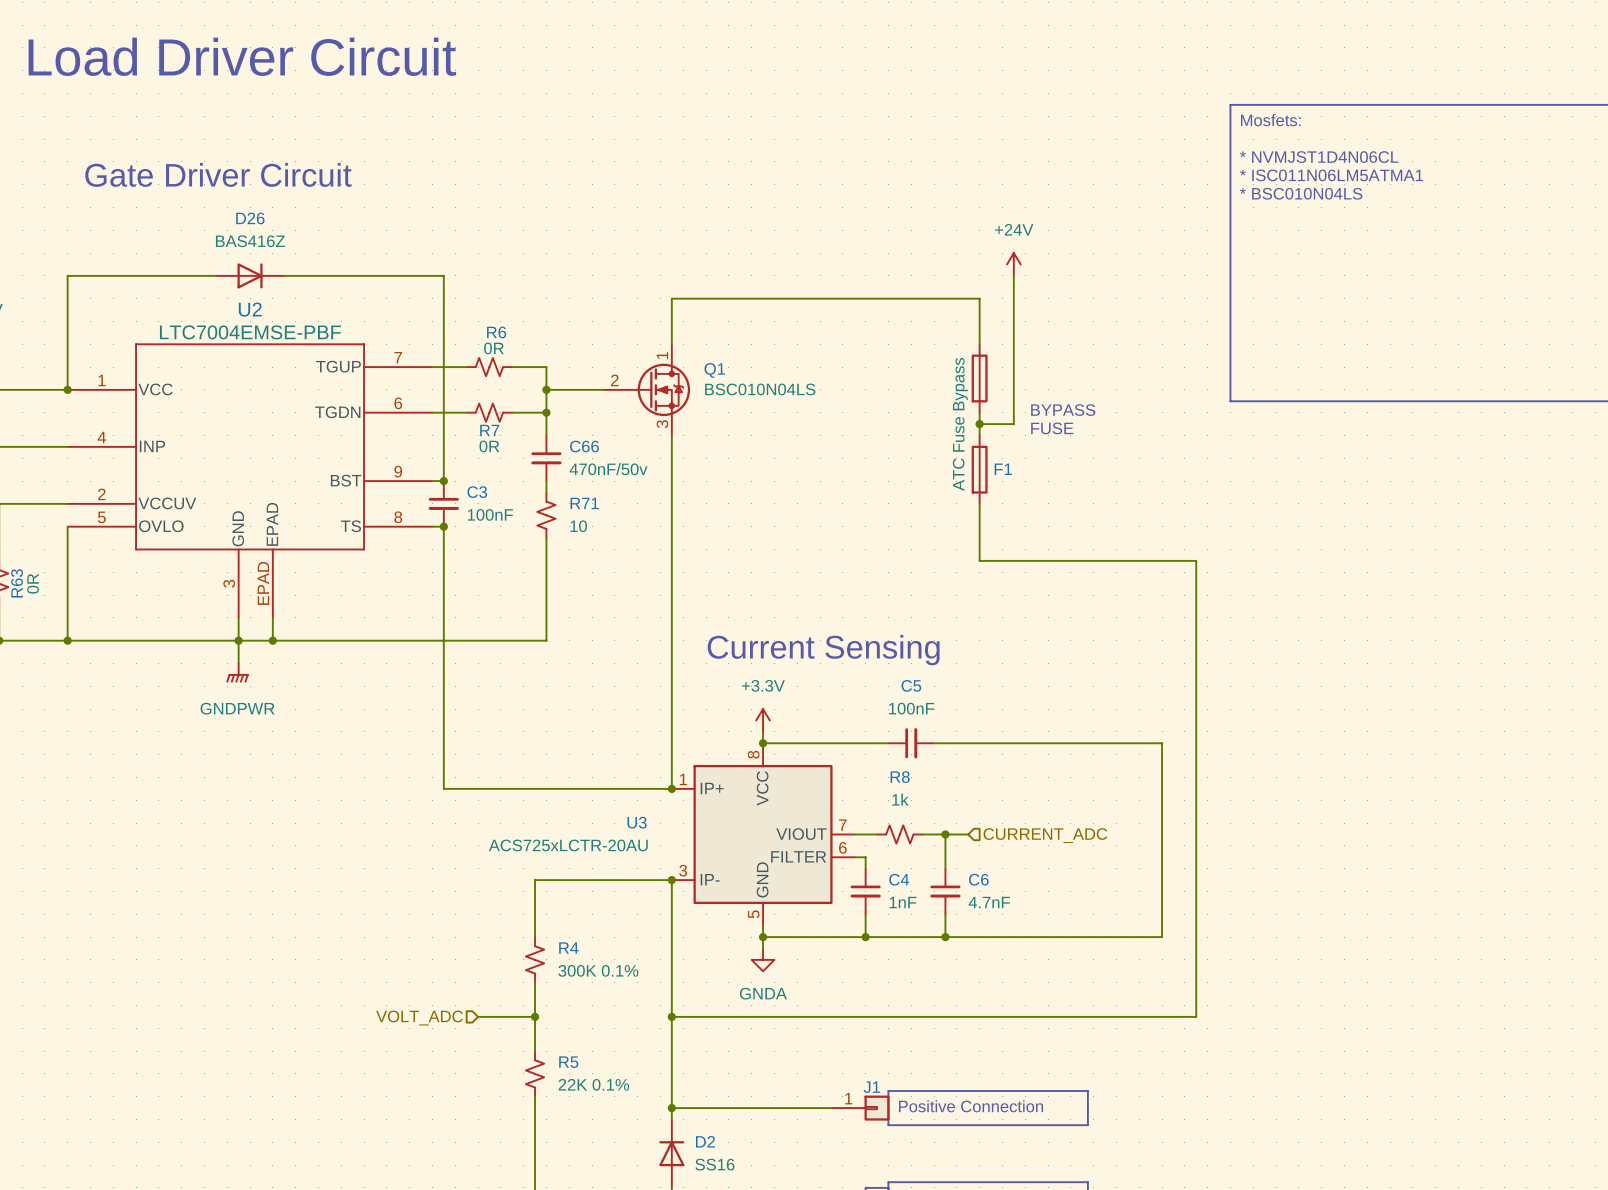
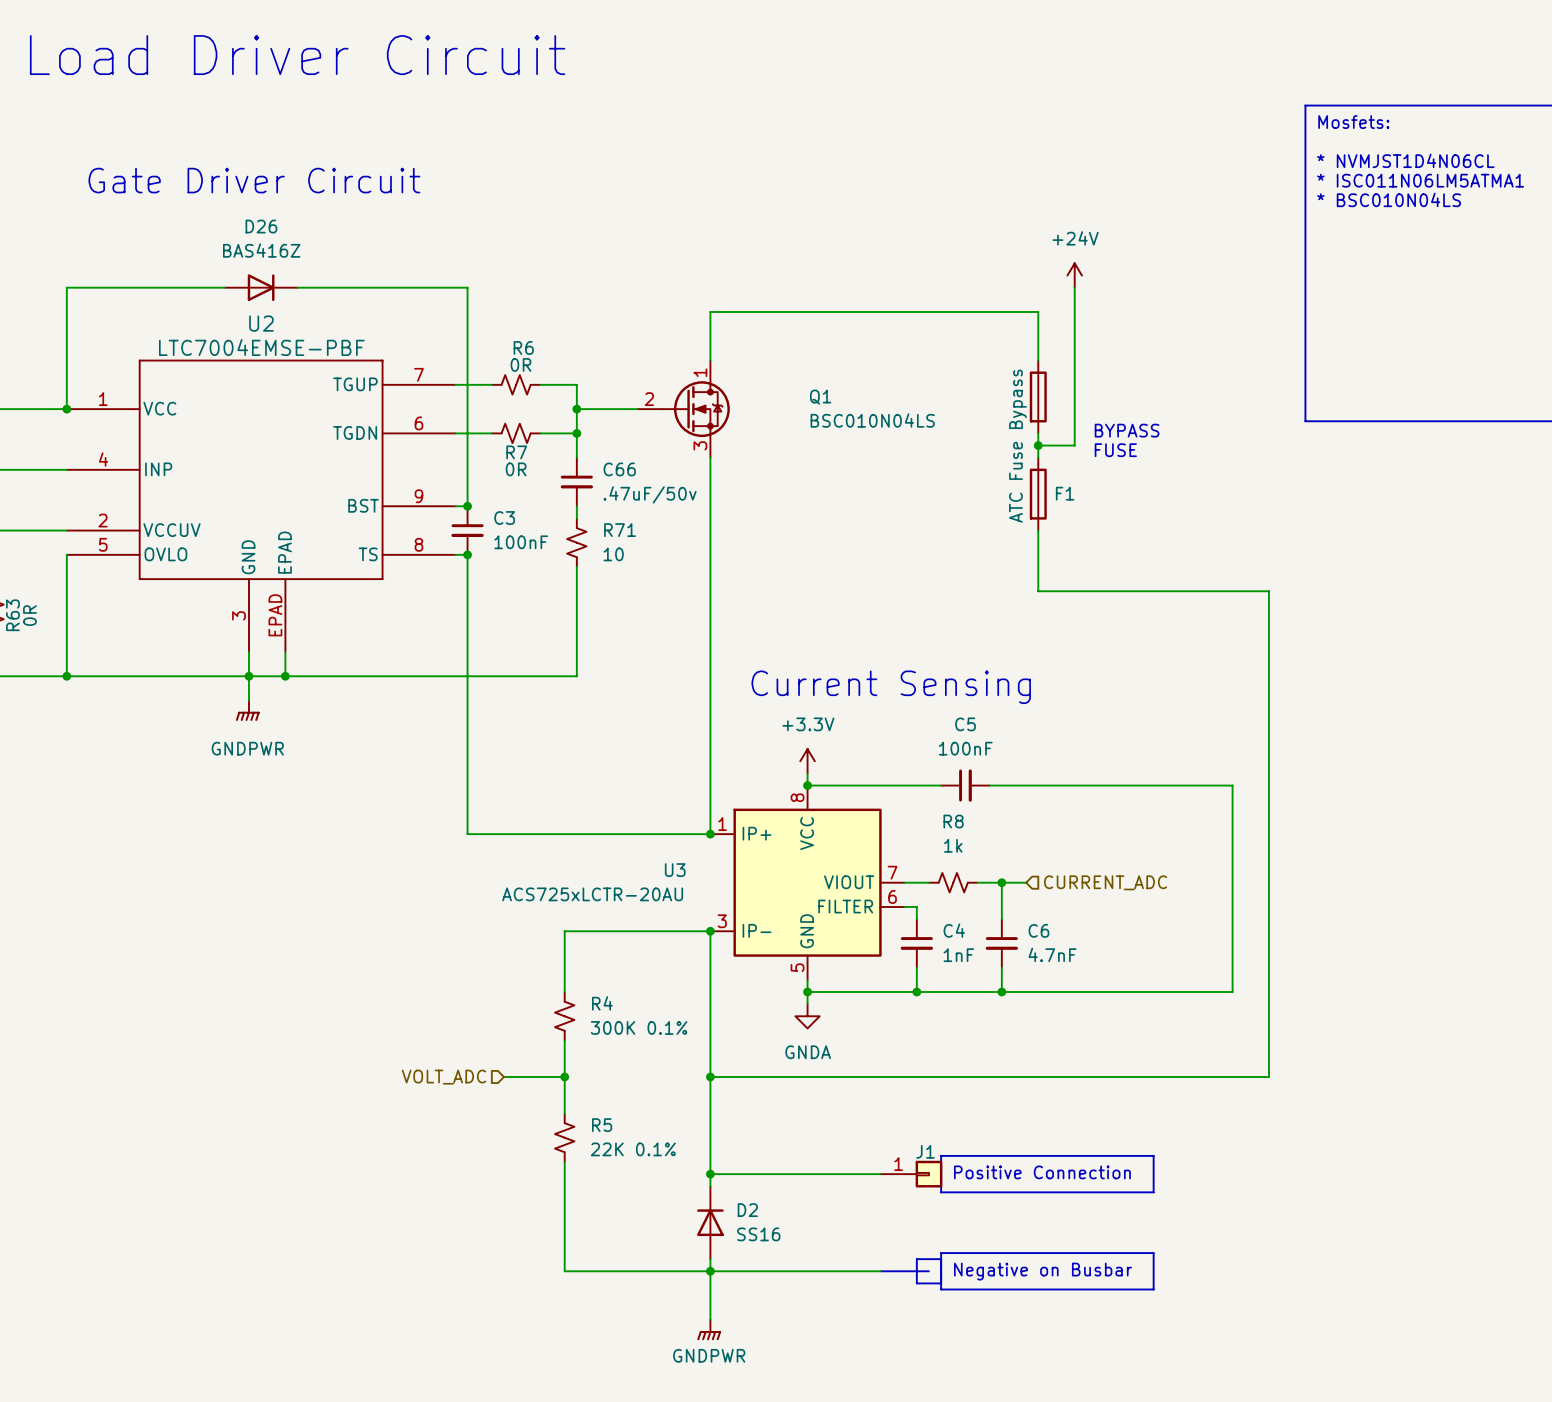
Q1 name position: Q1 (714, 370) -> Q1 (820, 397)
Q1 value position: BSC010N04LS (760, 389) -> BSC010N04LS (872, 420)
C66 value: 470nF/50v (608, 469) -> .47uF/50v (650, 494)

